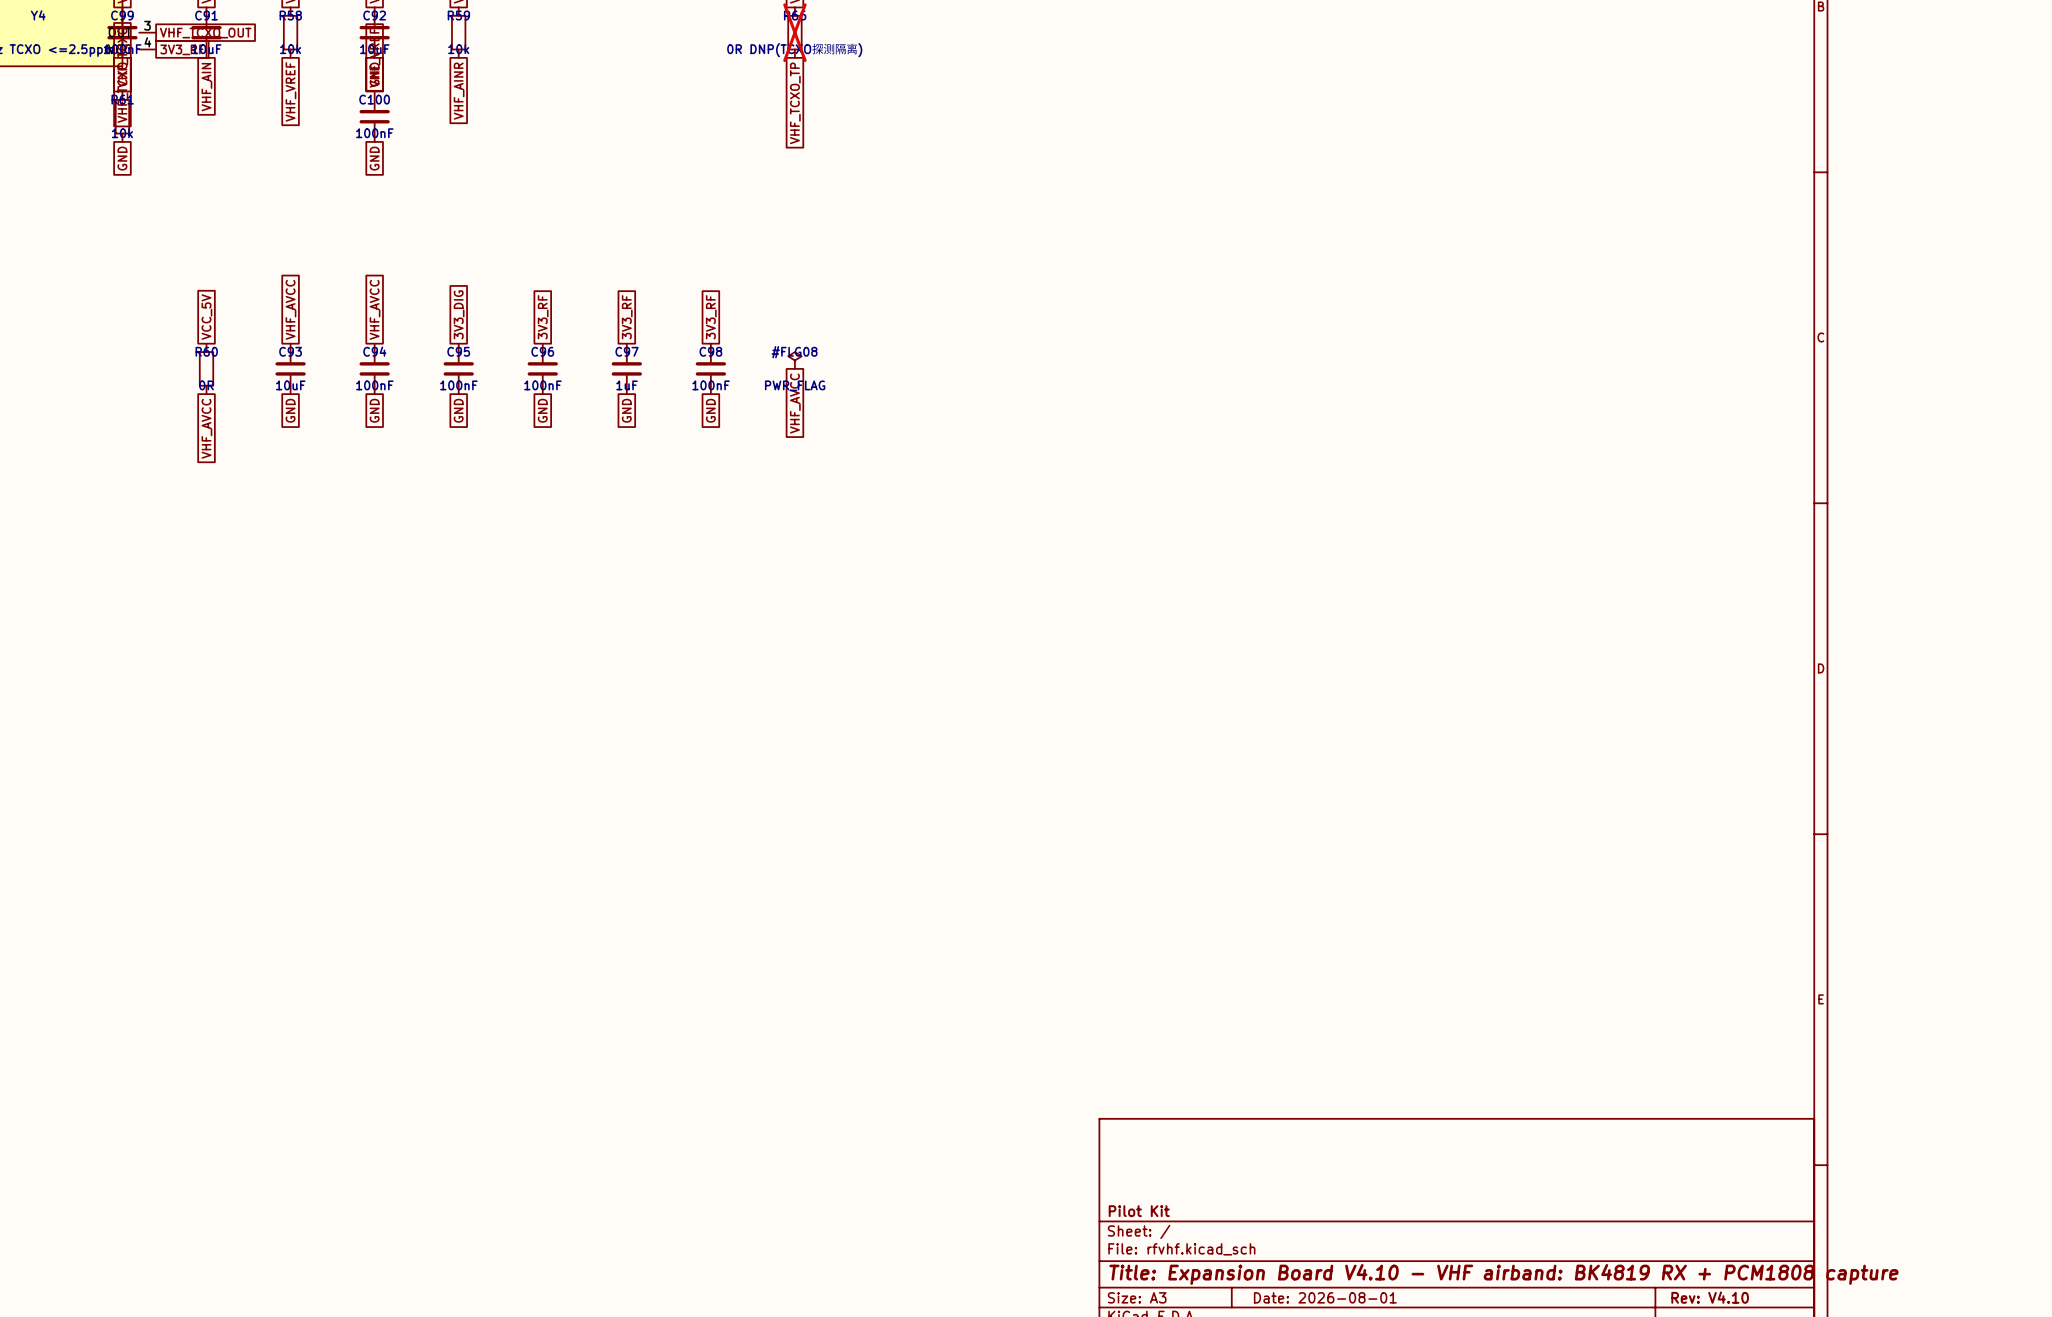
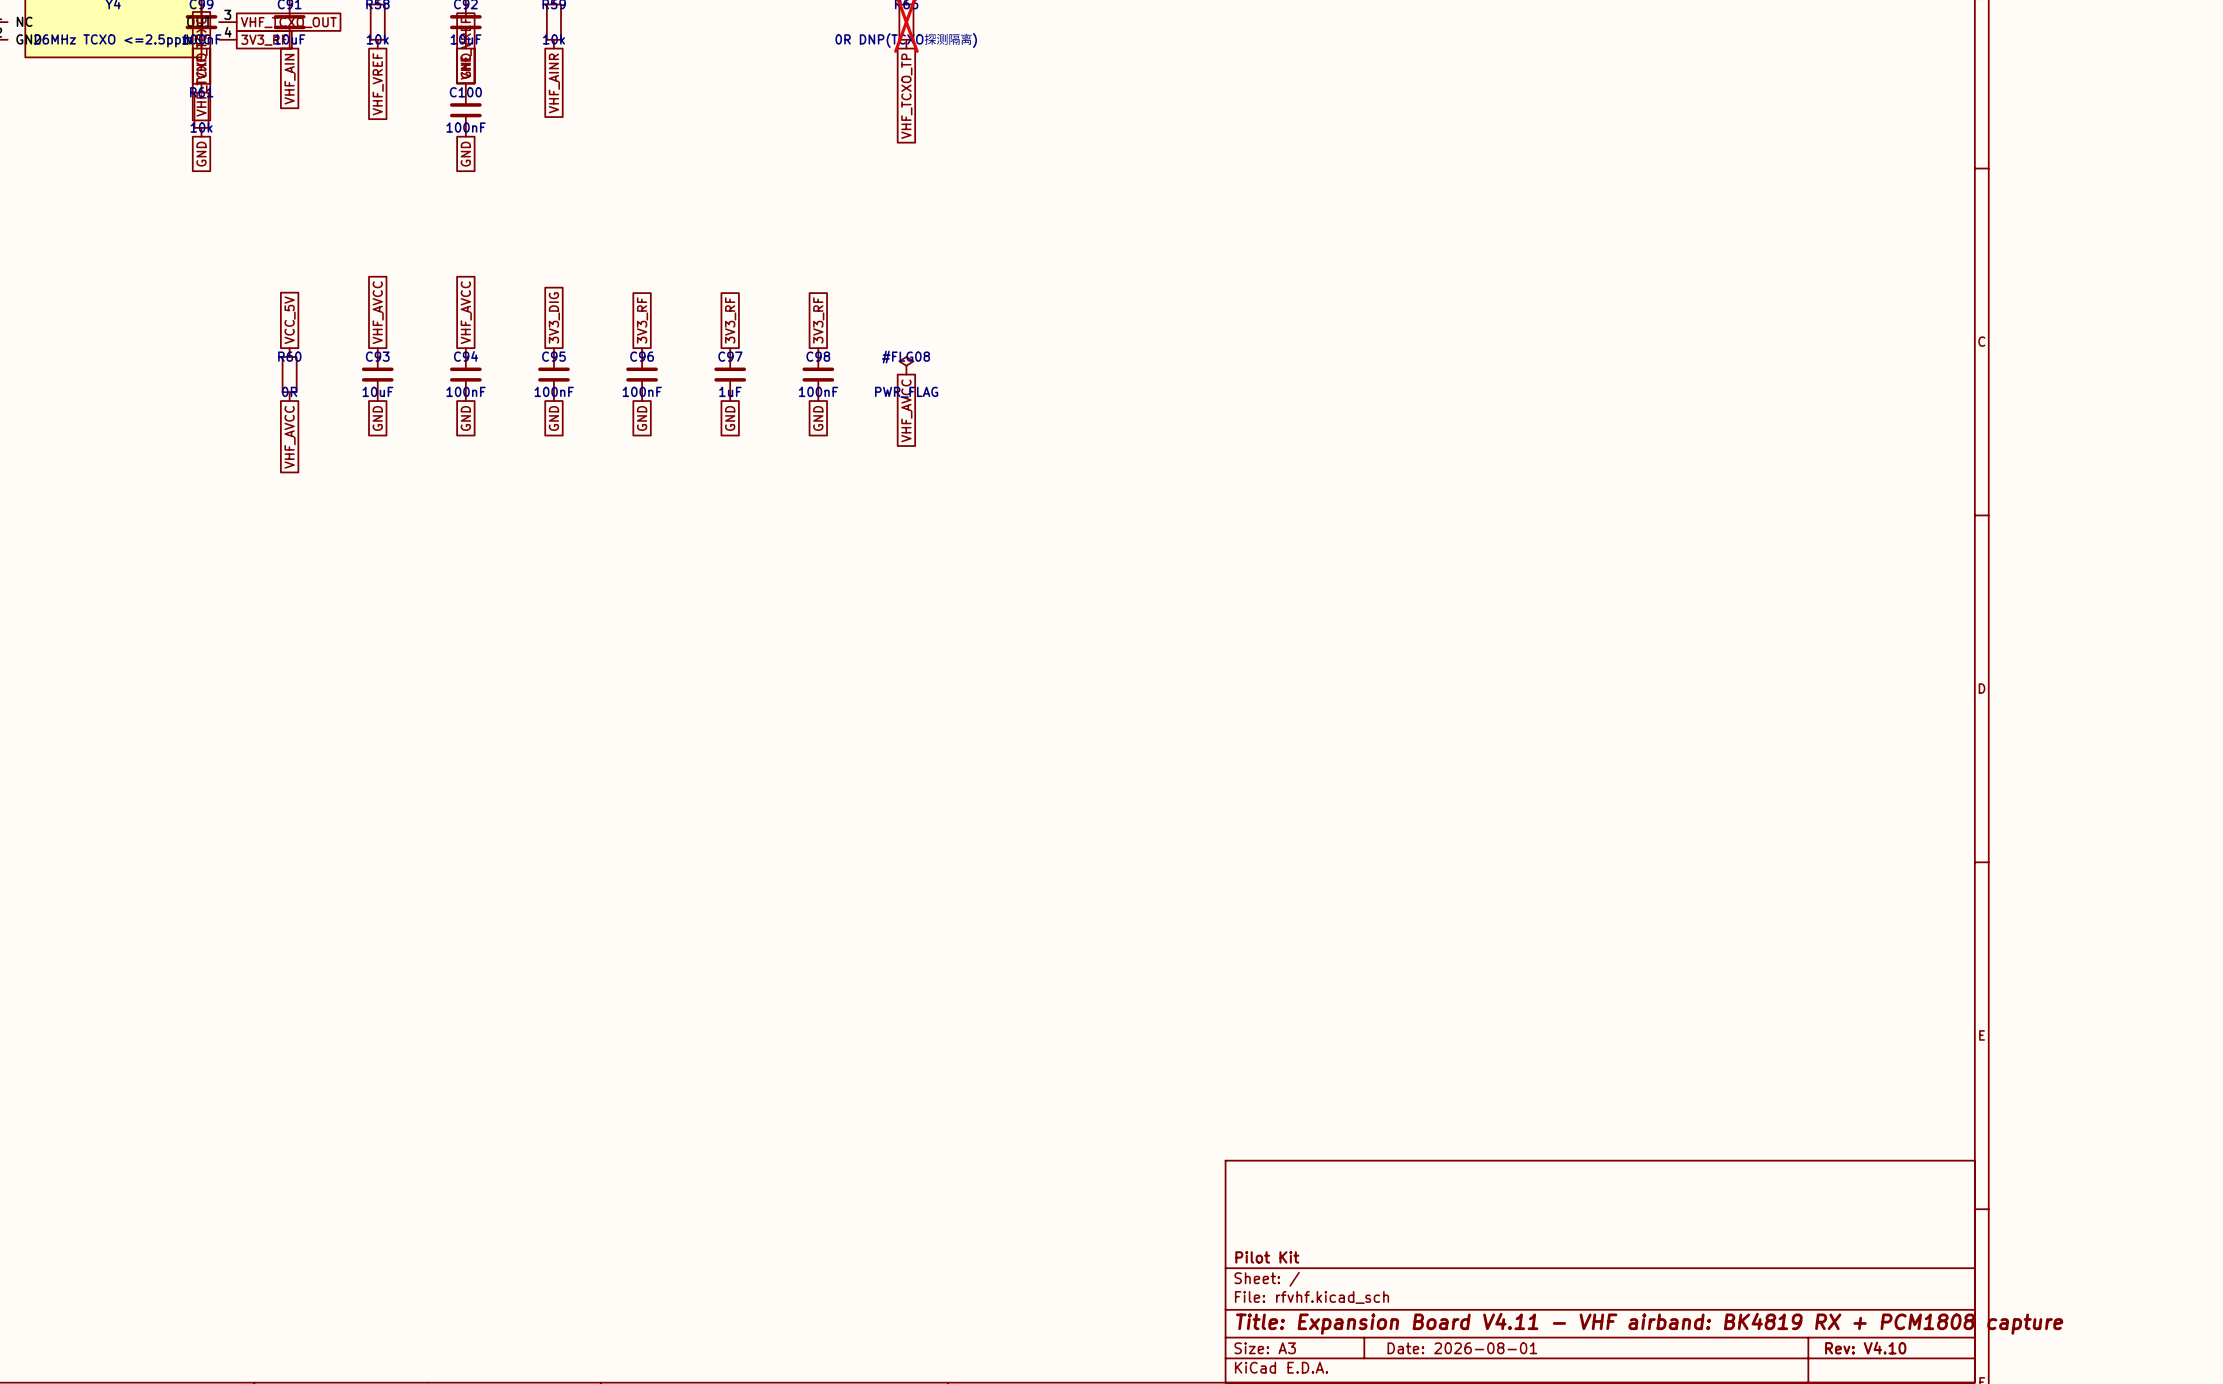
title block: Title: Expansion Board V4.10 - VHF airband: BK4819 RX + PCM1808 capture (1503, 1274) -> Title: Expansion Board V4.11 - VHF airband: BK4819 RX + PCM1808 capture (1649, 1323)

